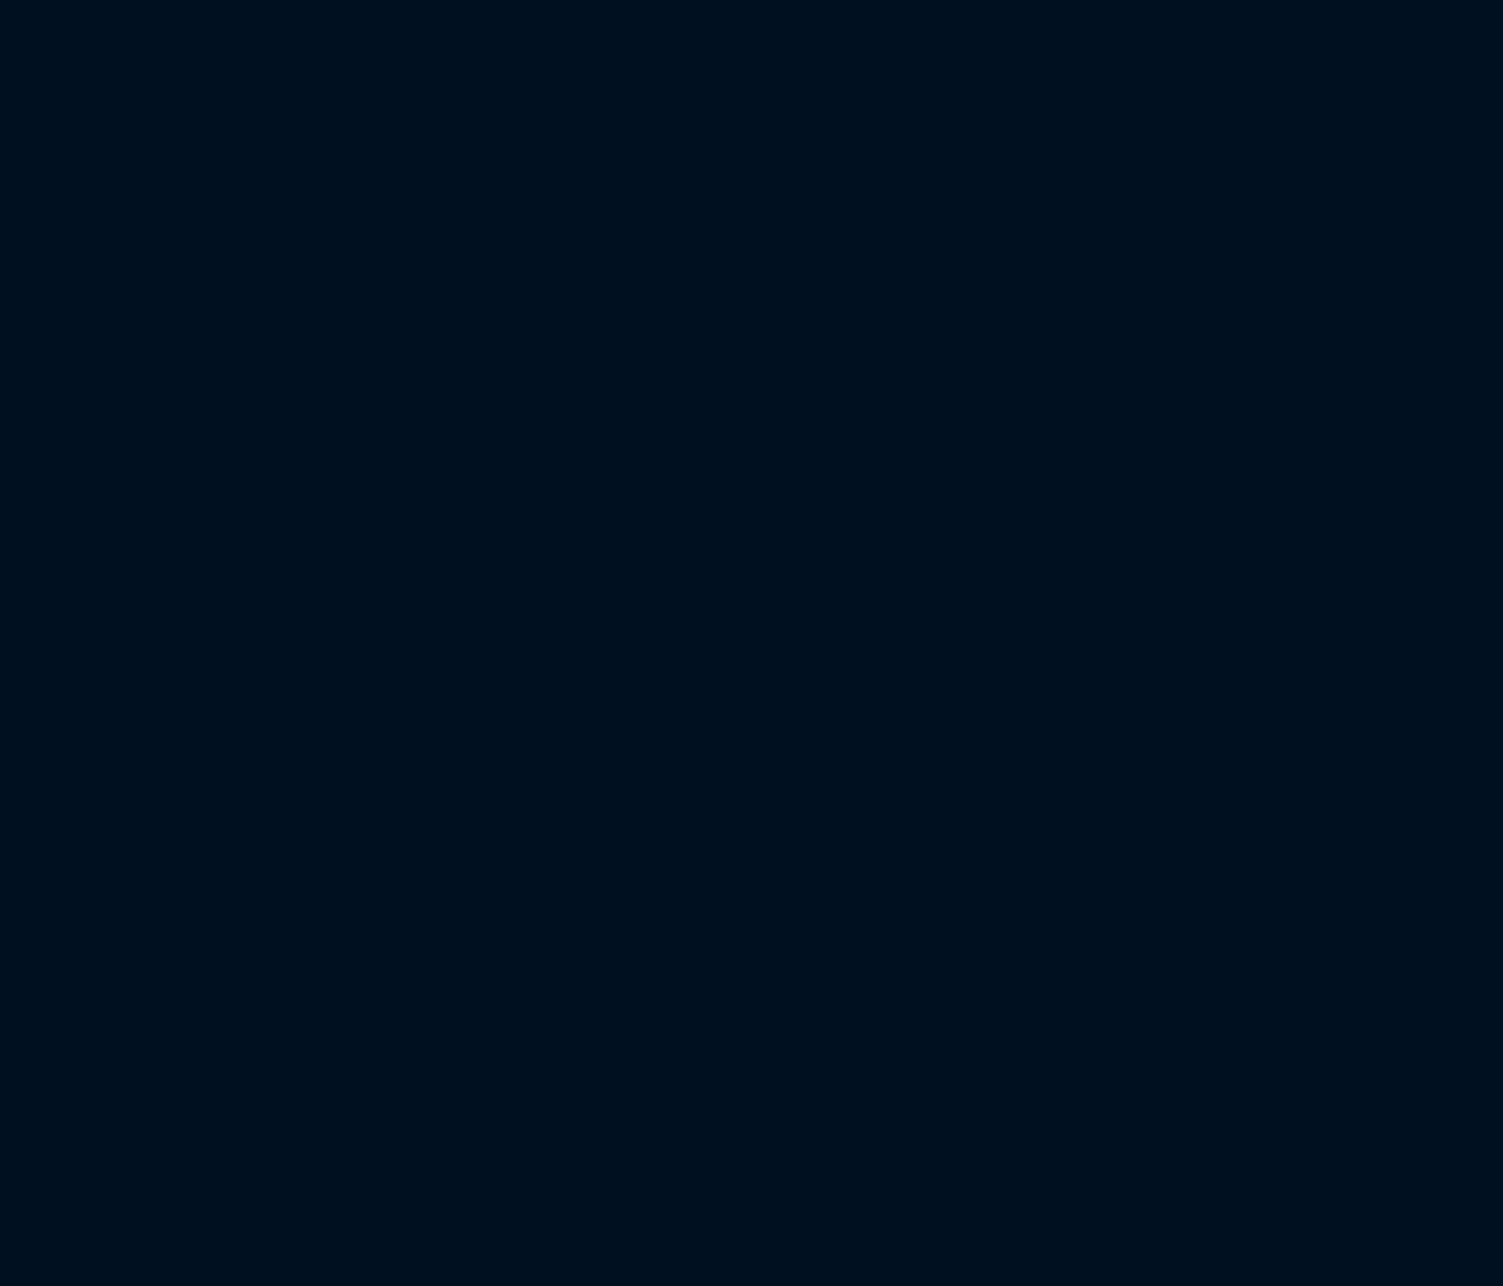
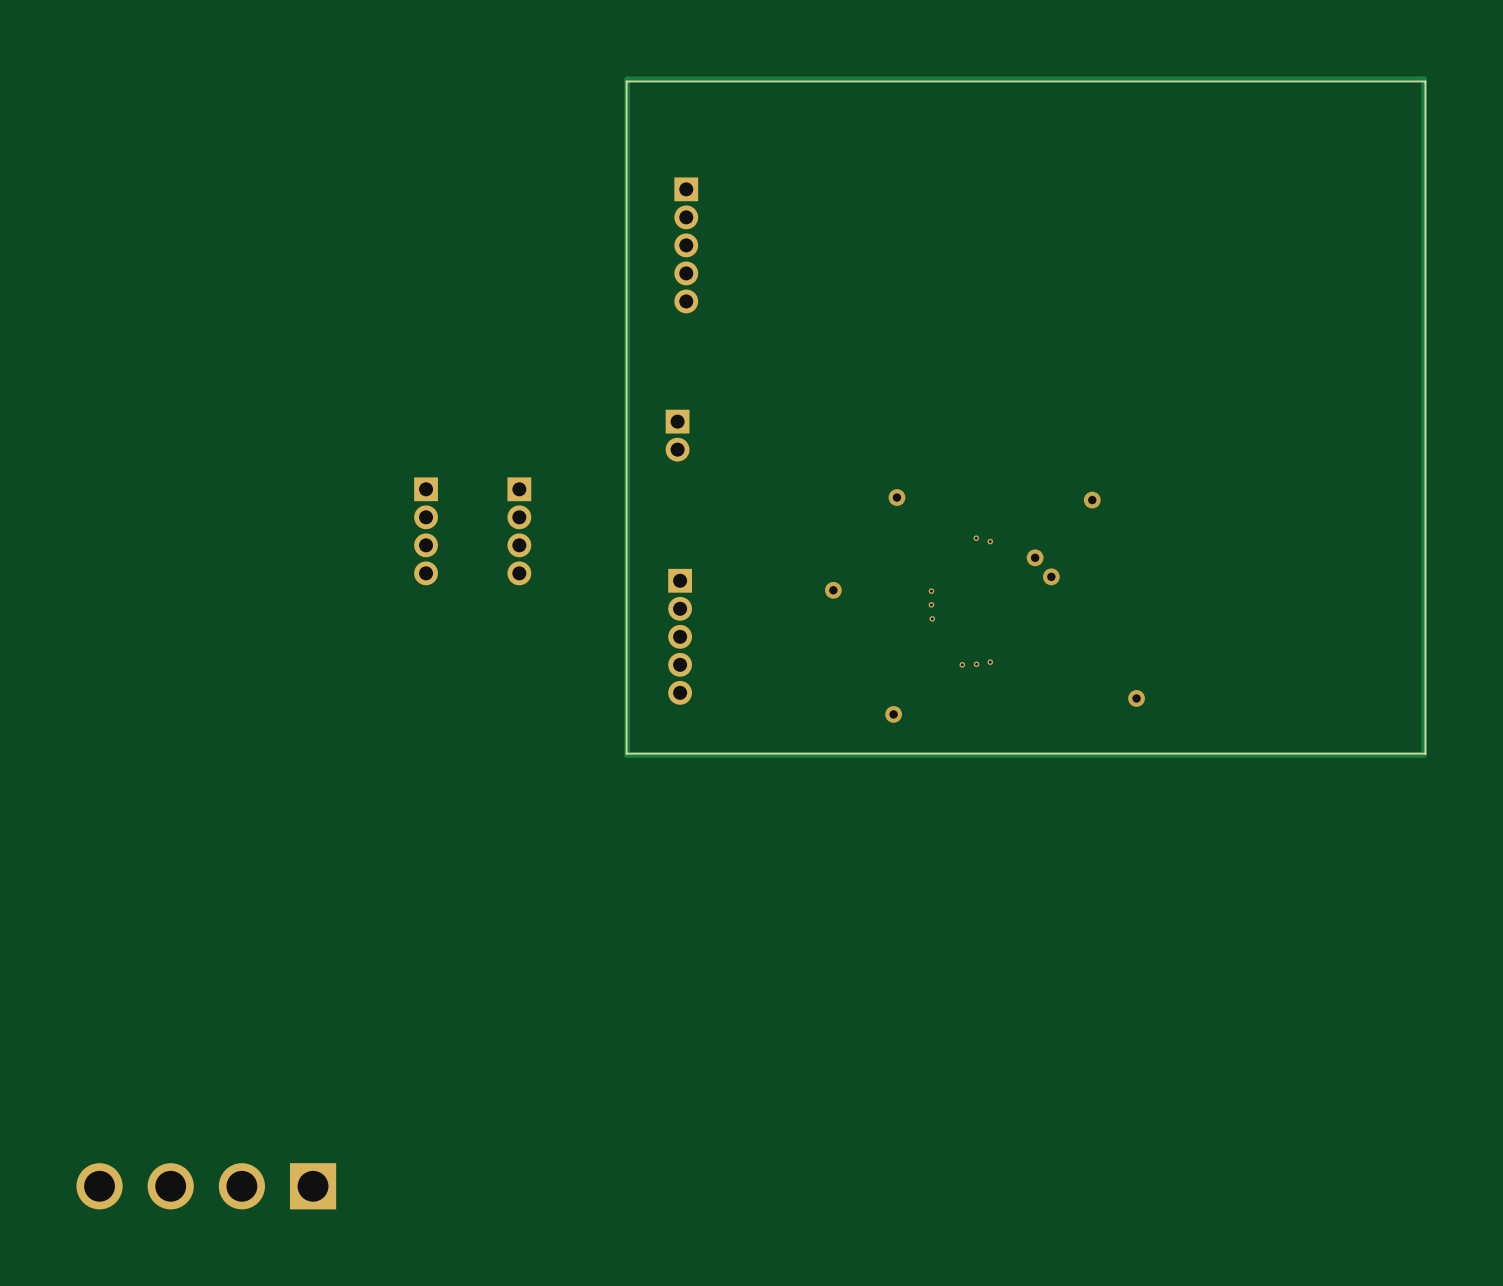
track: none -> (1424, 79) (627, 79) (627, 755) (1424, 755) (1424, 79)
board edge: none -> (1425, 81) (626, 81) (626, 753) (1425, 753) (1425, 81)
part: none -> (686, 245)
part: none -> (677, 435)
via: none -> (896, 497)
via: none -> (1092, 500)
part: none -> (426, 531)
part: none -> (519, 531)
via: none -> (976, 538)
via: none -> (990, 541)
via: none -> (1035, 557)
via: none -> (1051, 576)
via: none -> (833, 590)
via: none -> (931, 591)
via: none -> (931, 604)
via: none -> (932, 618)
part: none -> (680, 636)
via: none -> (990, 662)
via: none -> (962, 664)
via: none -> (976, 664)
via: none -> (1136, 698)
via: none -> (893, 714)
part: none -> (206, 1186)

